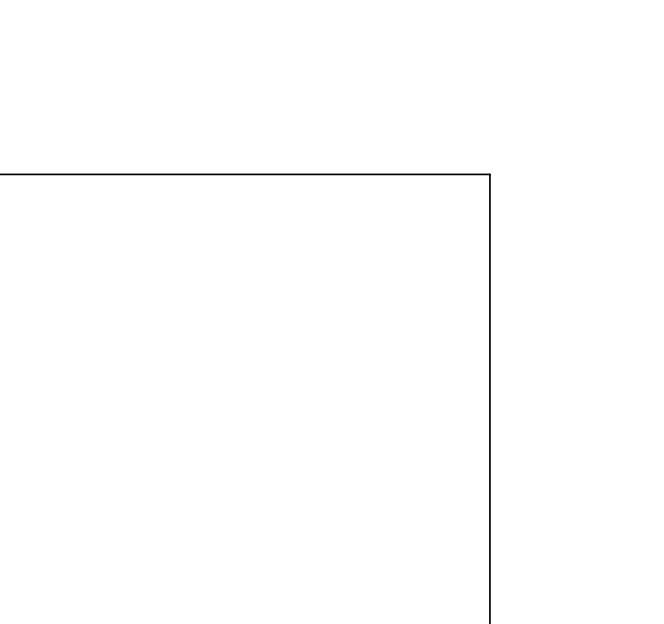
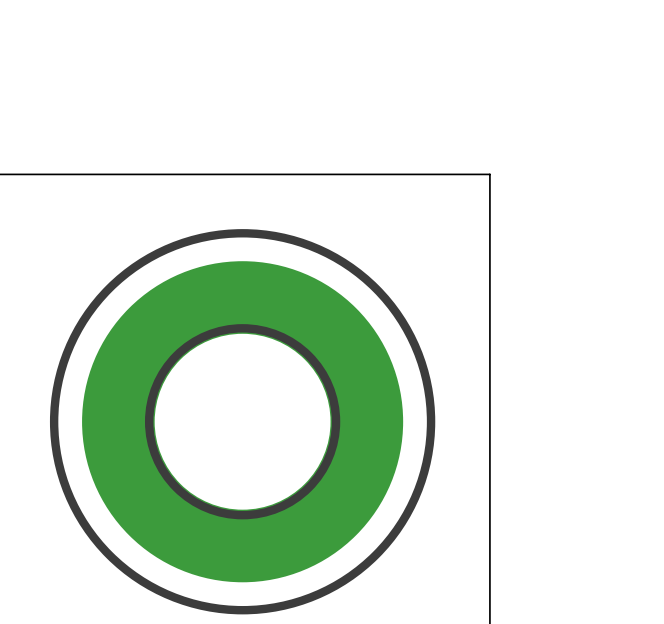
part: none -> (242, 421)

